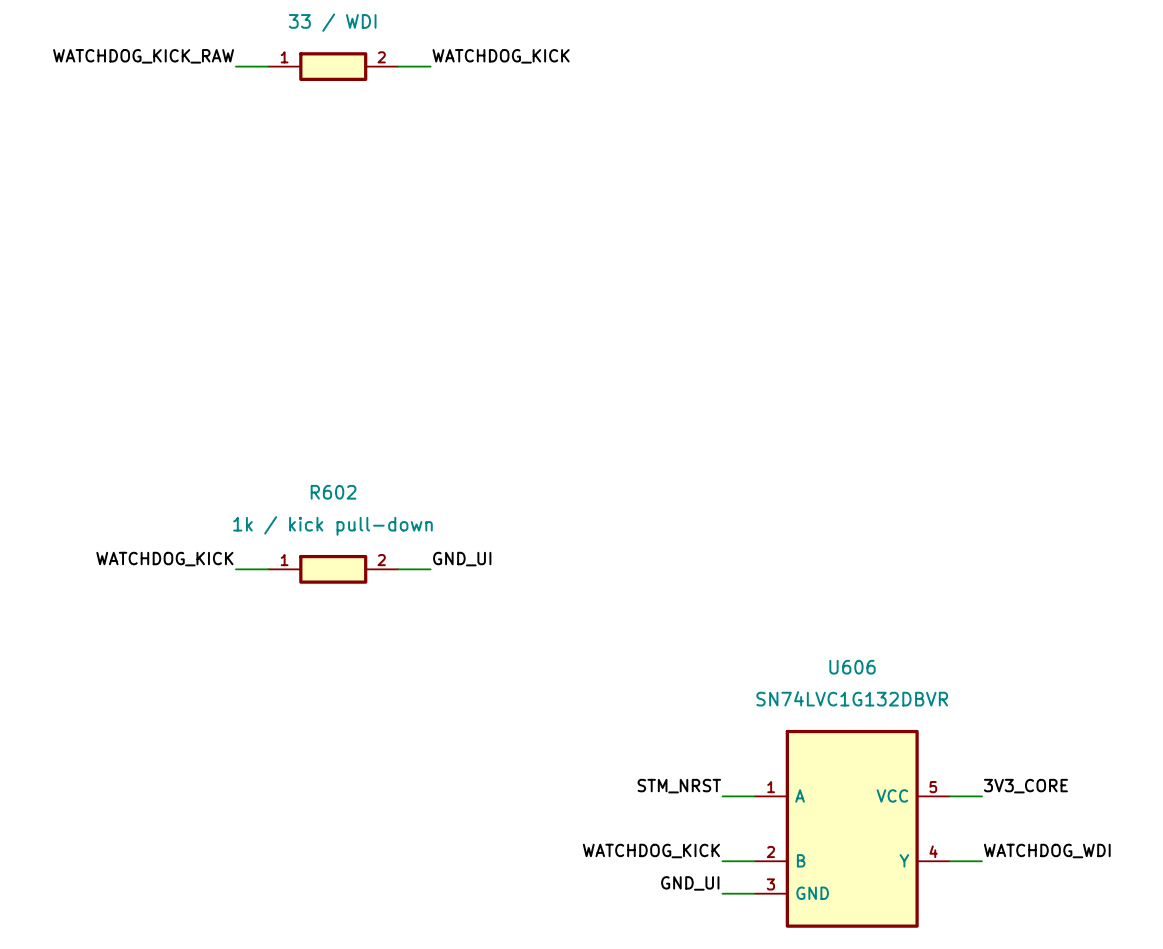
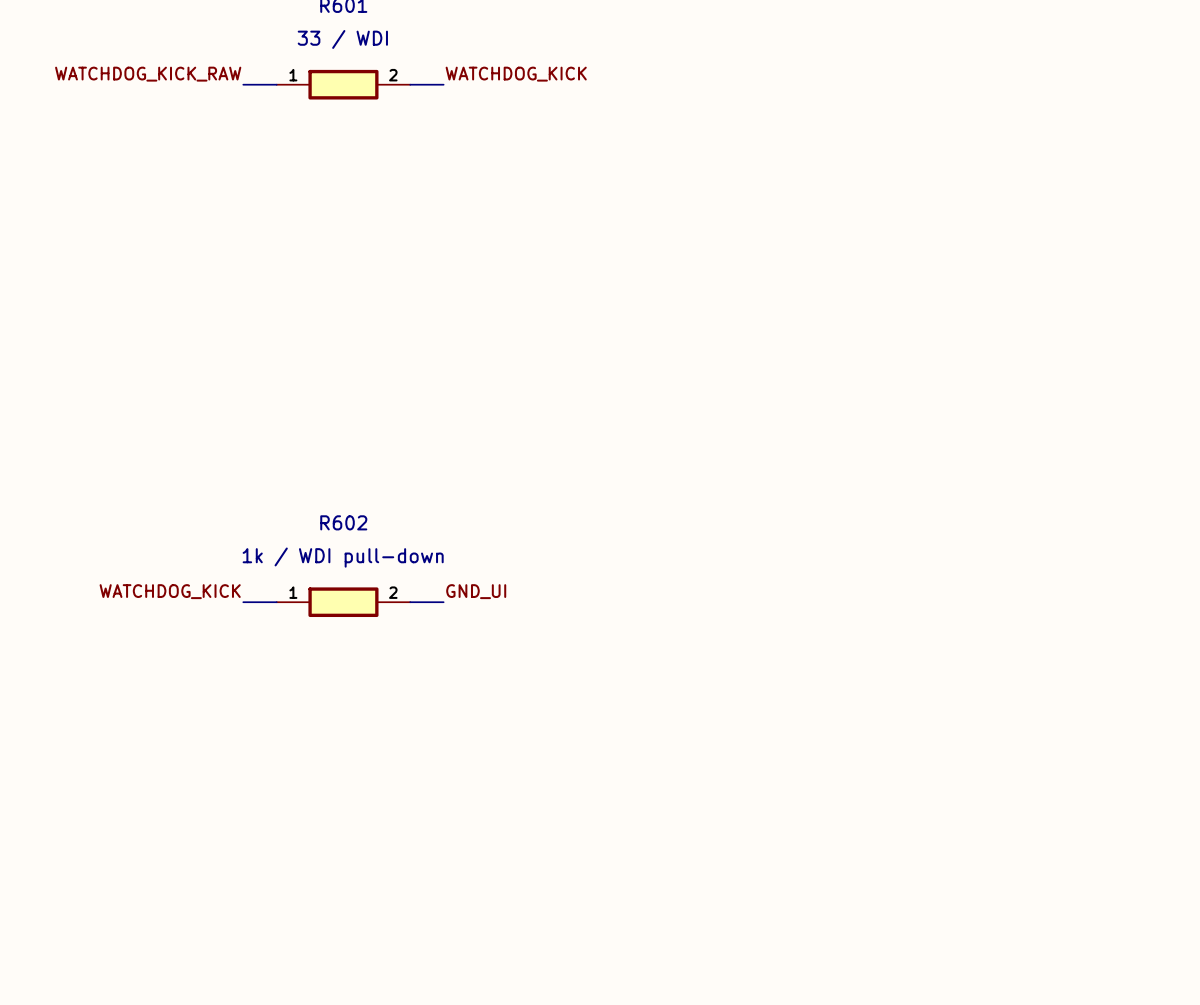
R602 value: 1k / kick pull-down (332, 526) -> 1k / WDI pull-down (343, 557)
label: STM_NRST (679, 786) -> none
label: 3V3_CORE (1025, 786) -> none
wire: (722, 796) (754, 796) -> none
wire: (949, 796) (981, 796) -> none
U606: SN74LVC1G132DBVR (852, 828) -> none
label: WATCHDOG_KICK (651, 850) -> none
label: WATCHDOG_WDI (1047, 850) -> none
wire: (722, 861) (754, 861) -> none
wire: (949, 861) (981, 861) -> none
label: GND_UI (690, 883) -> none
wire: (722, 893) (754, 893) -> none

